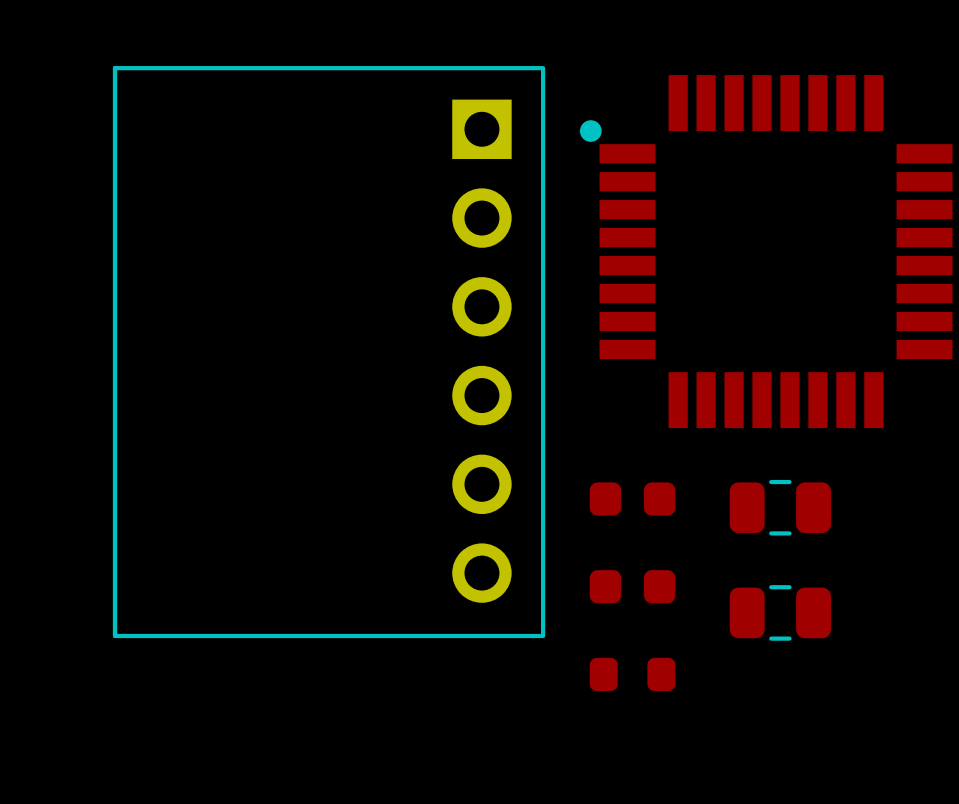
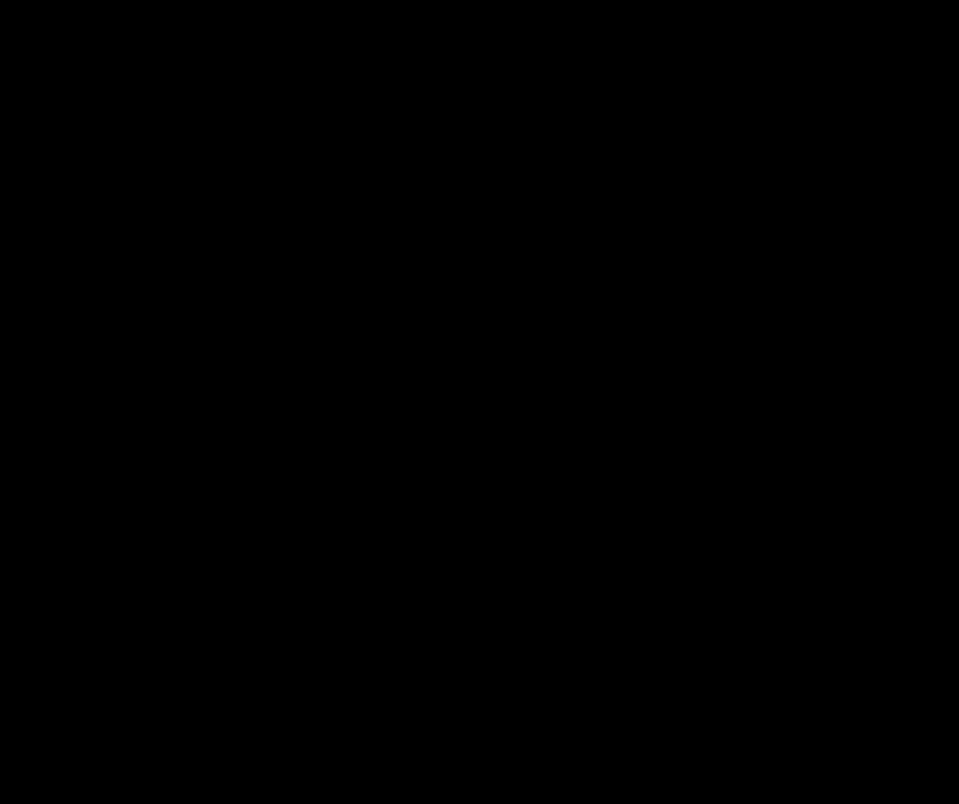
part: (766, 251) -> none
part: (329, 352) -> none
part: (632, 499) -> none
part: (780, 507) -> none
part: (632, 586) -> none
part: (780, 612) -> none
part: (632, 674) -> none

